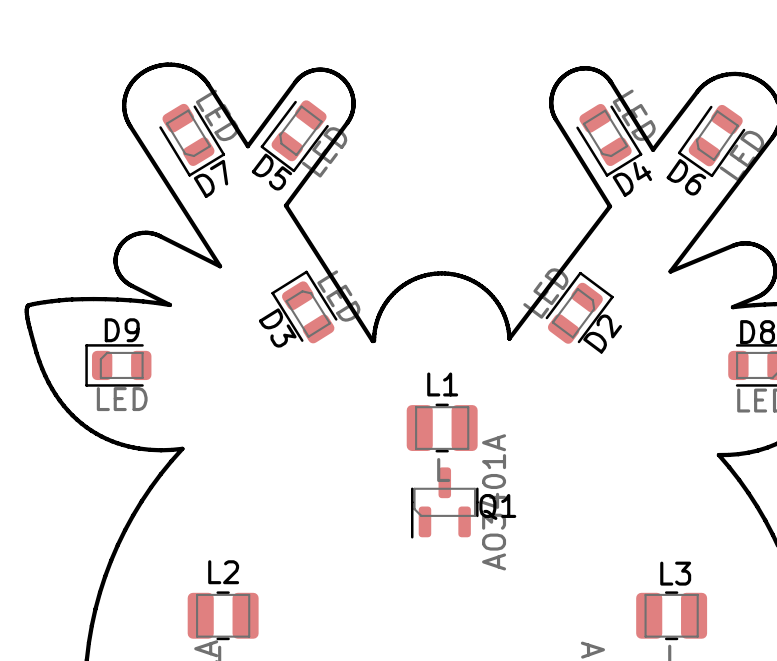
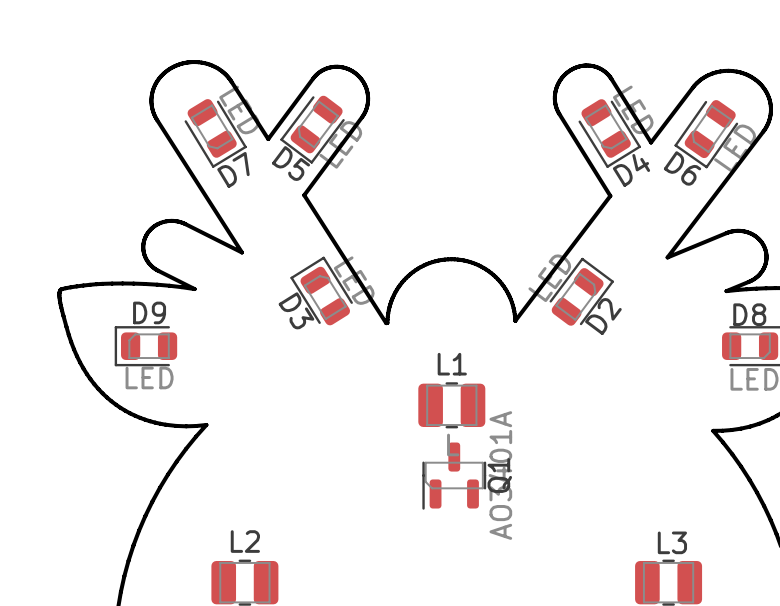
Q1 name rotation: 0° (497, 506) -> 90° counterclockwise (499, 475)

